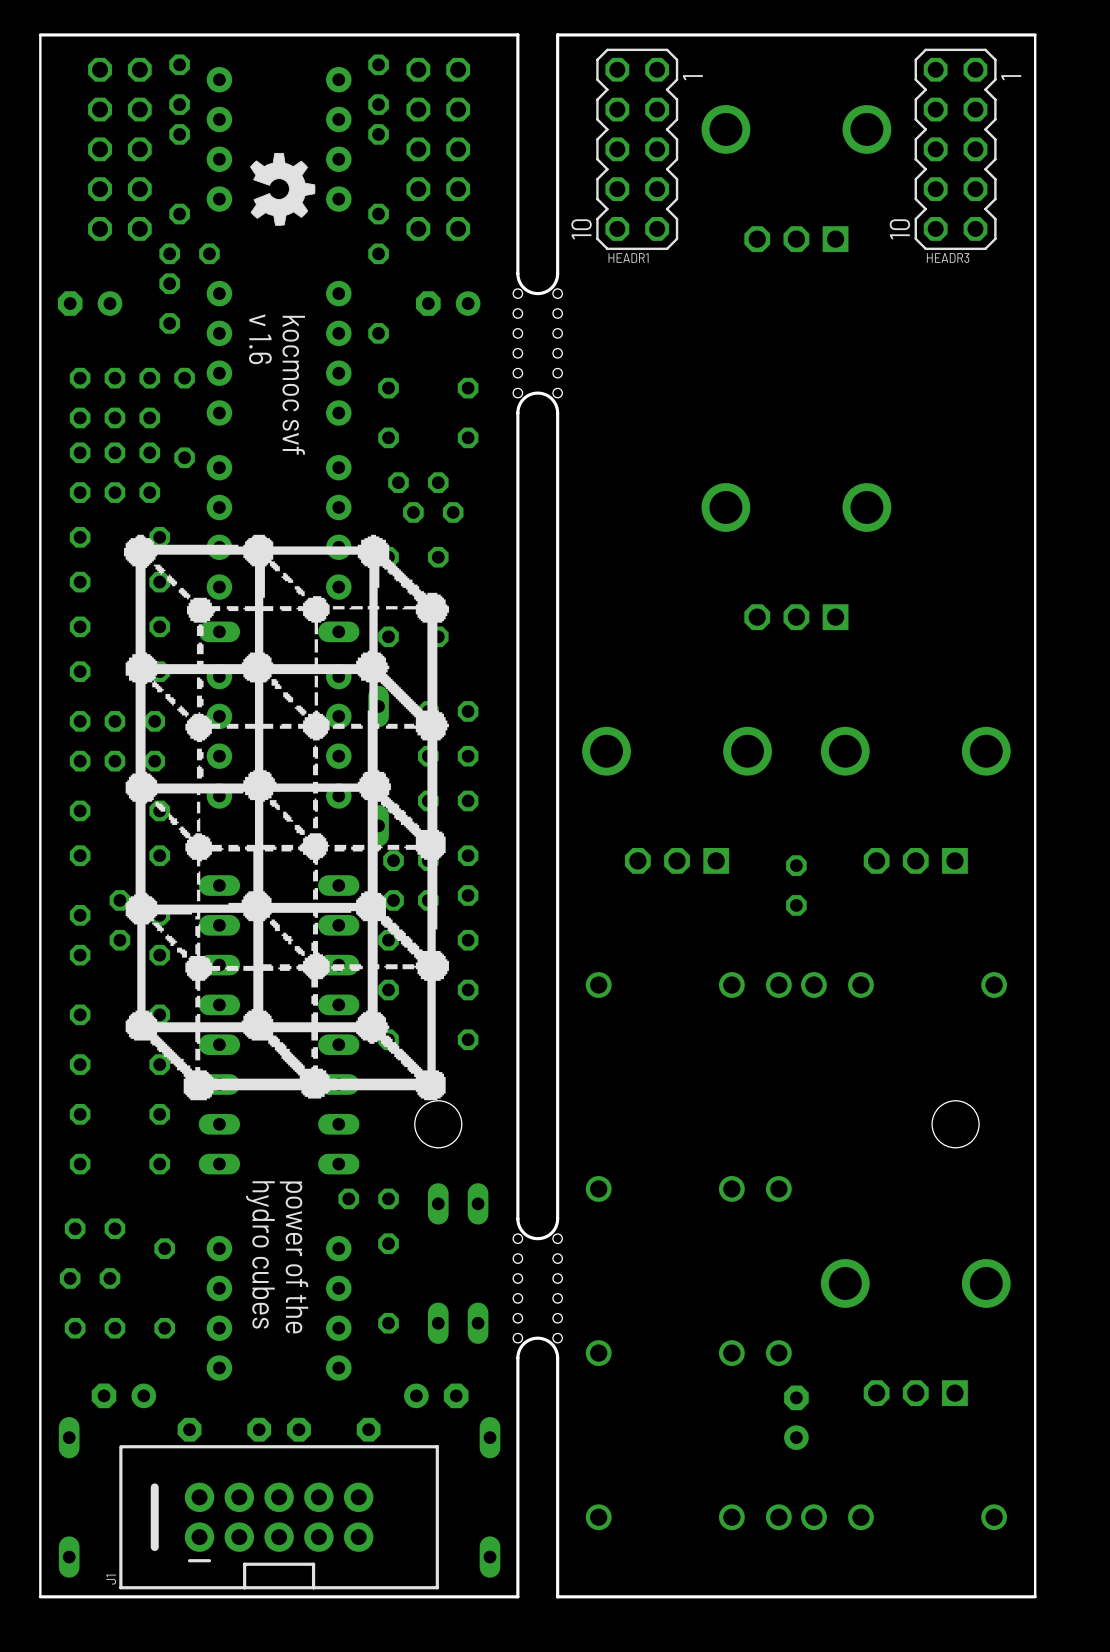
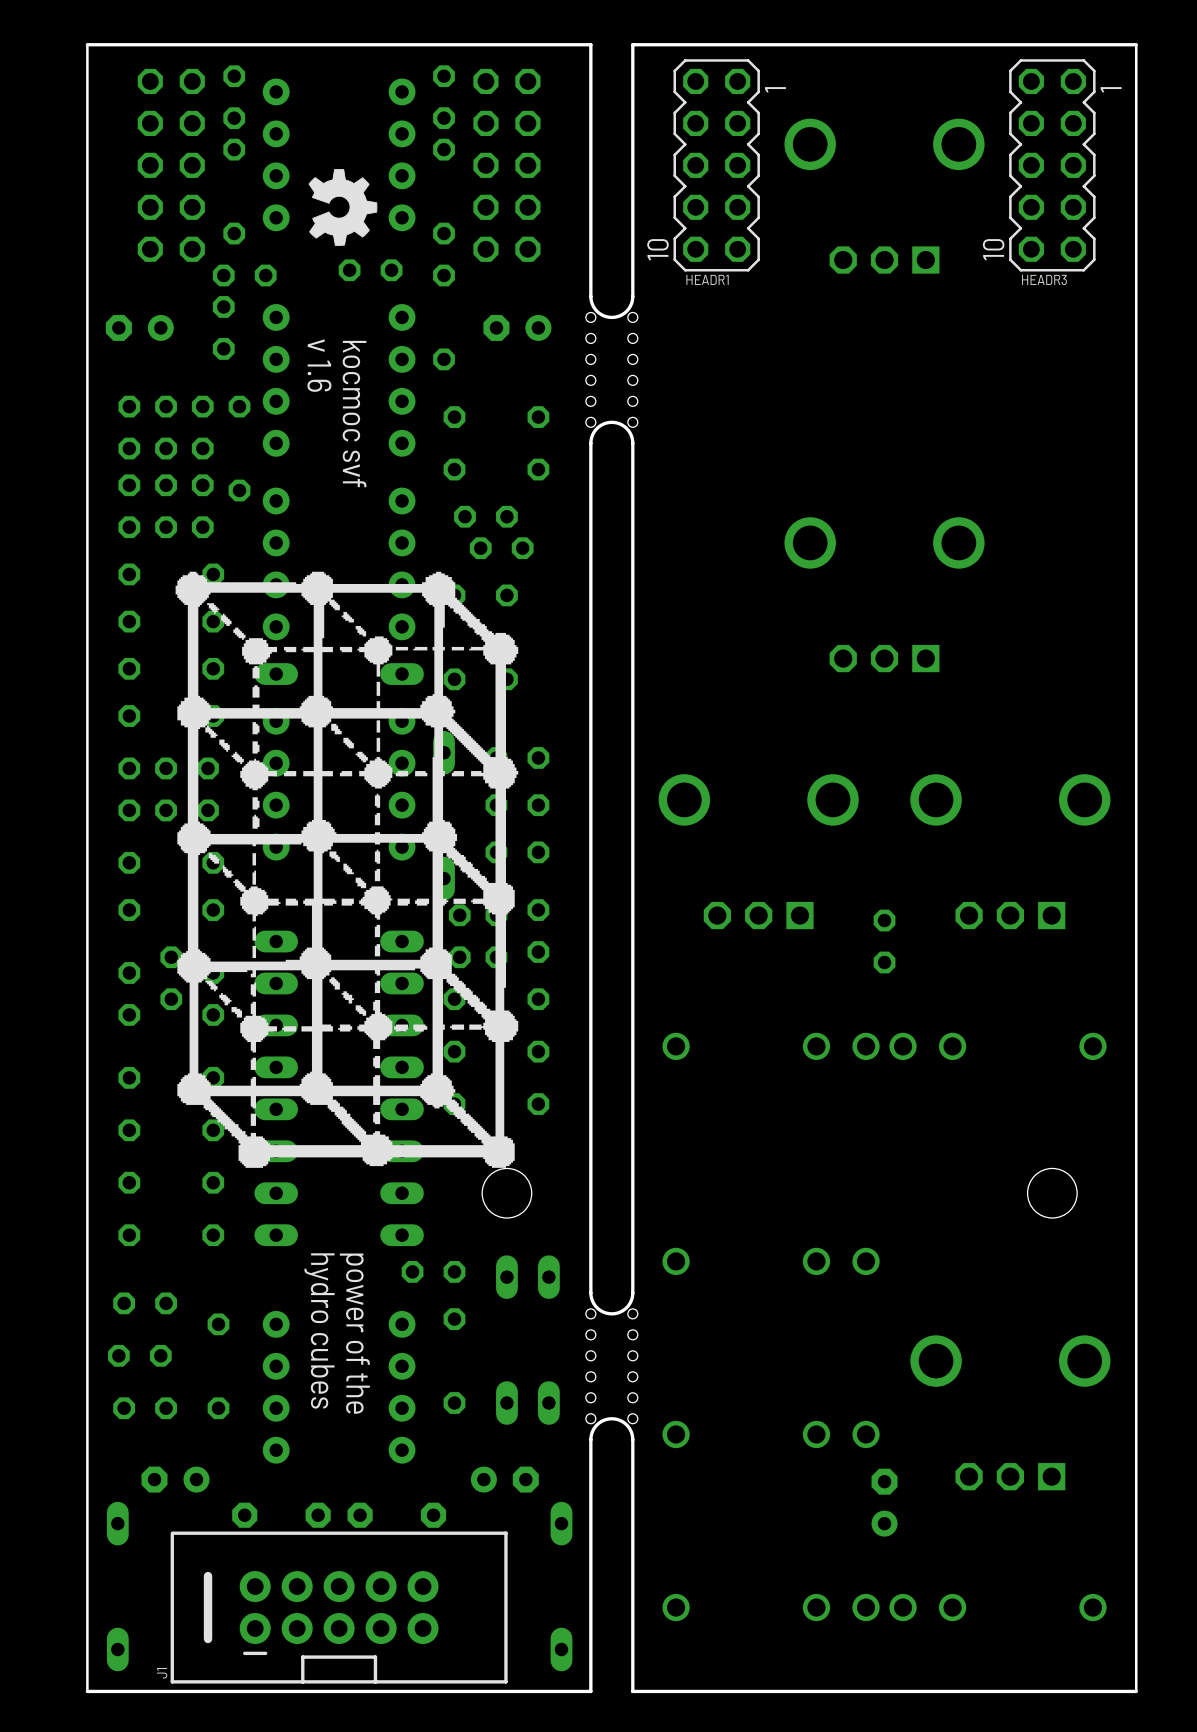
part: none -> (370, 270)

